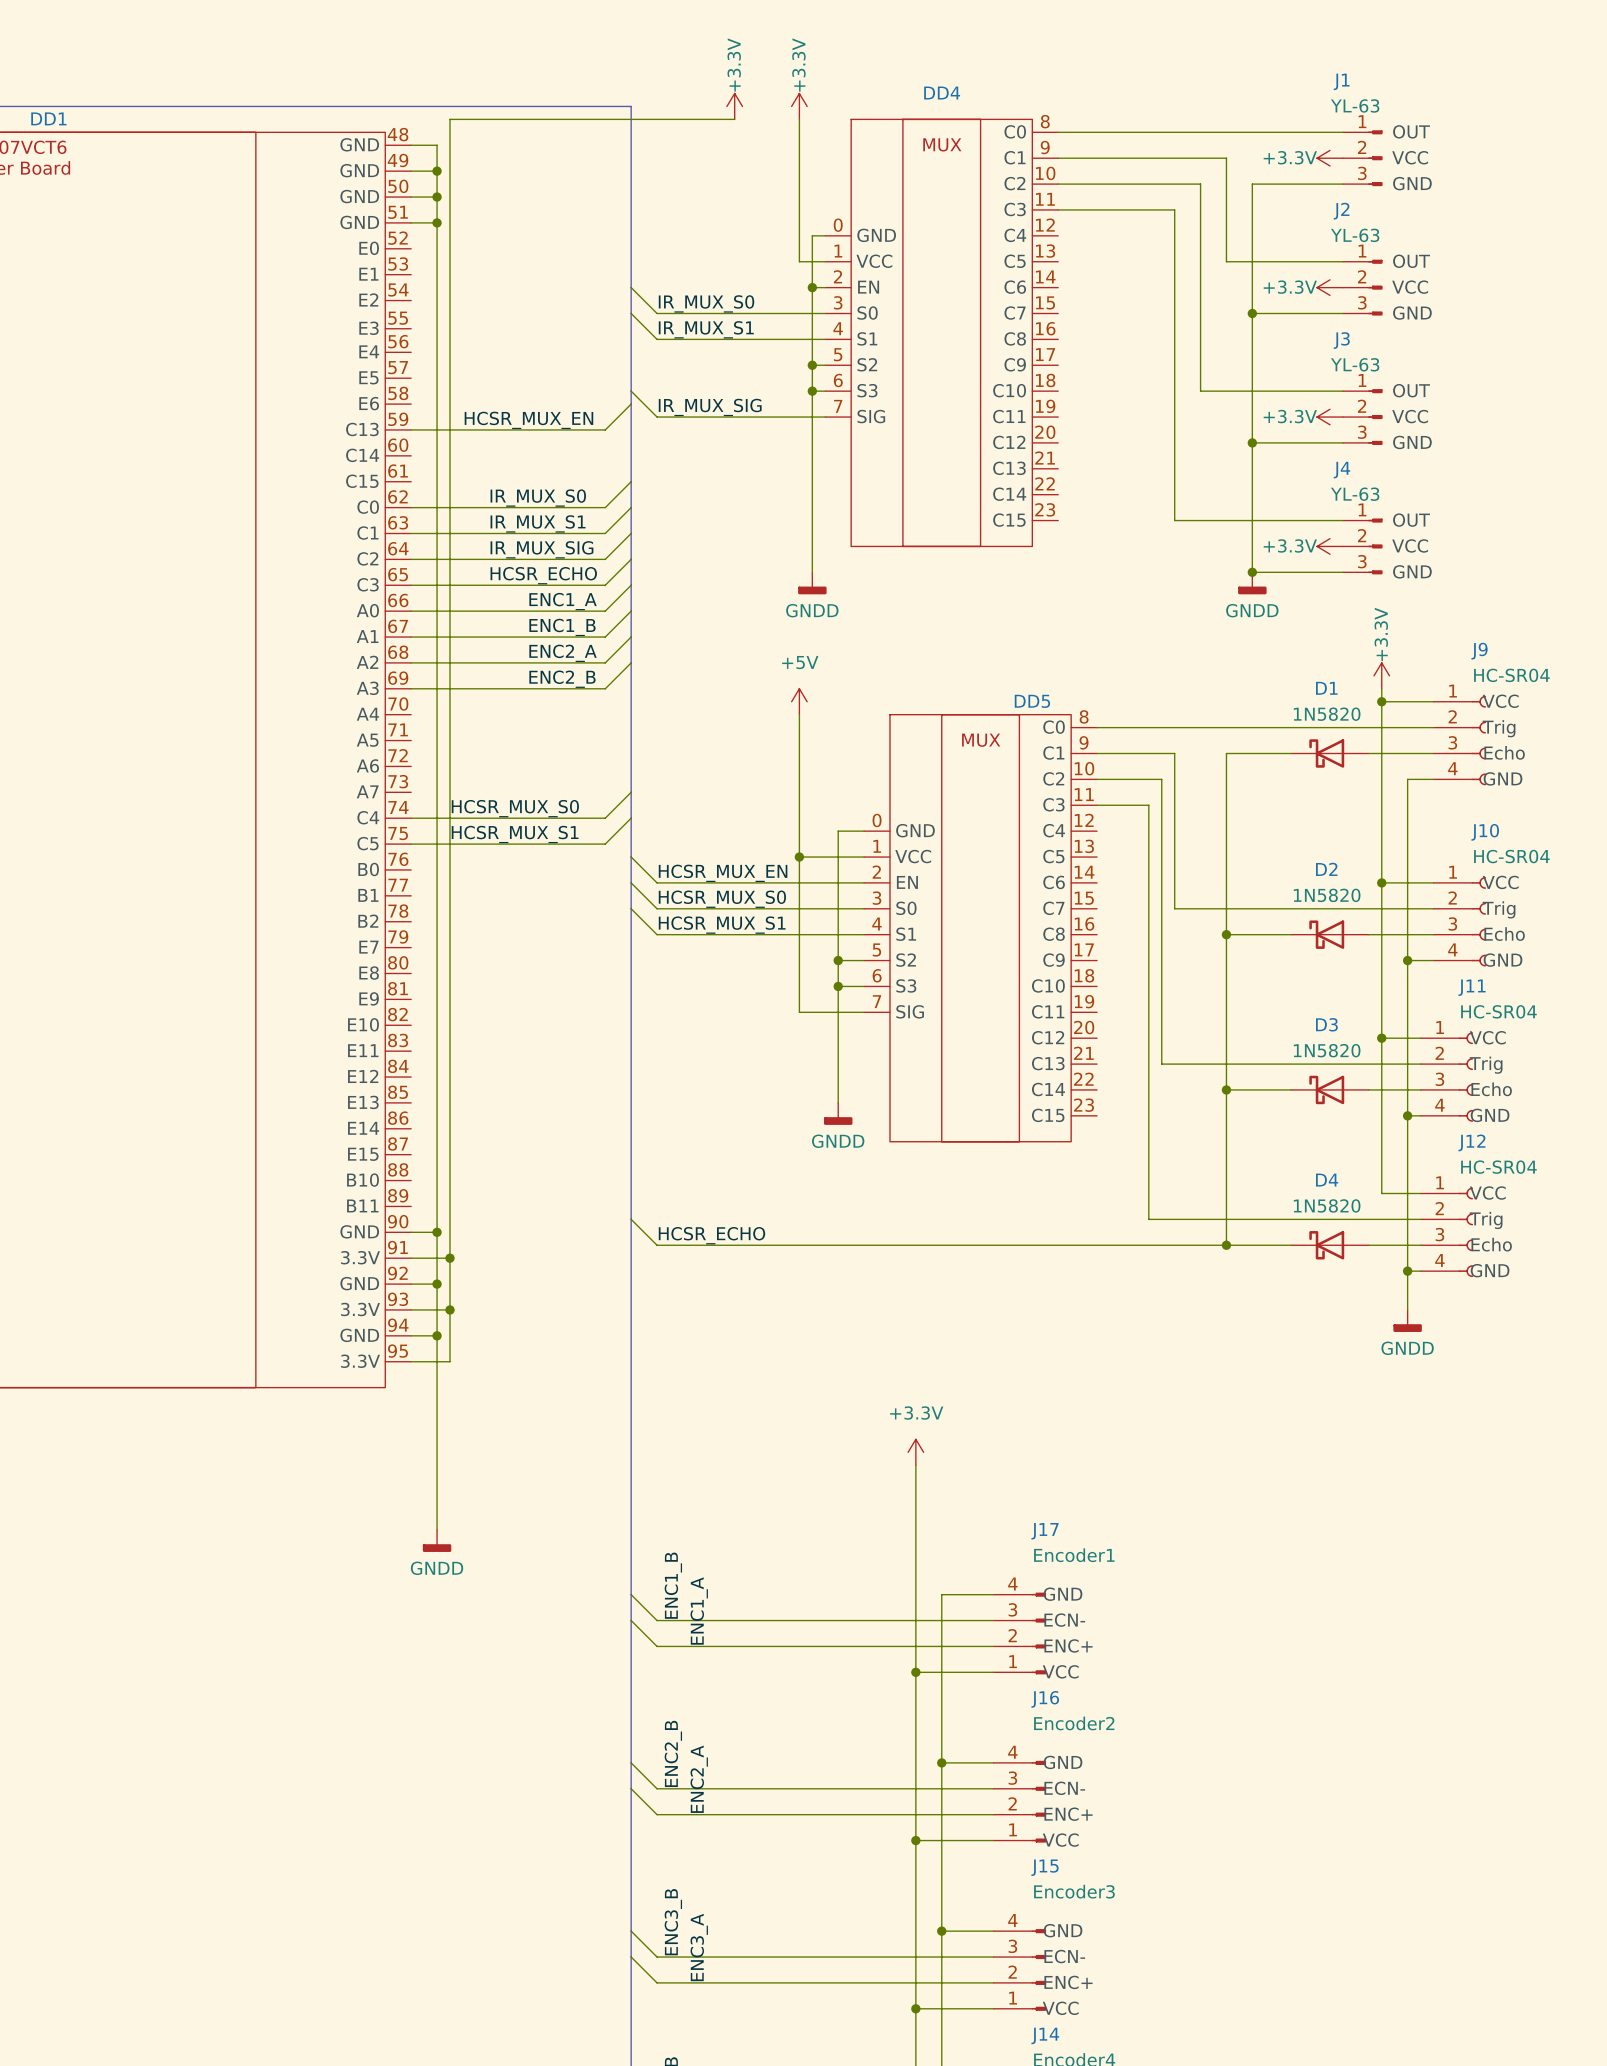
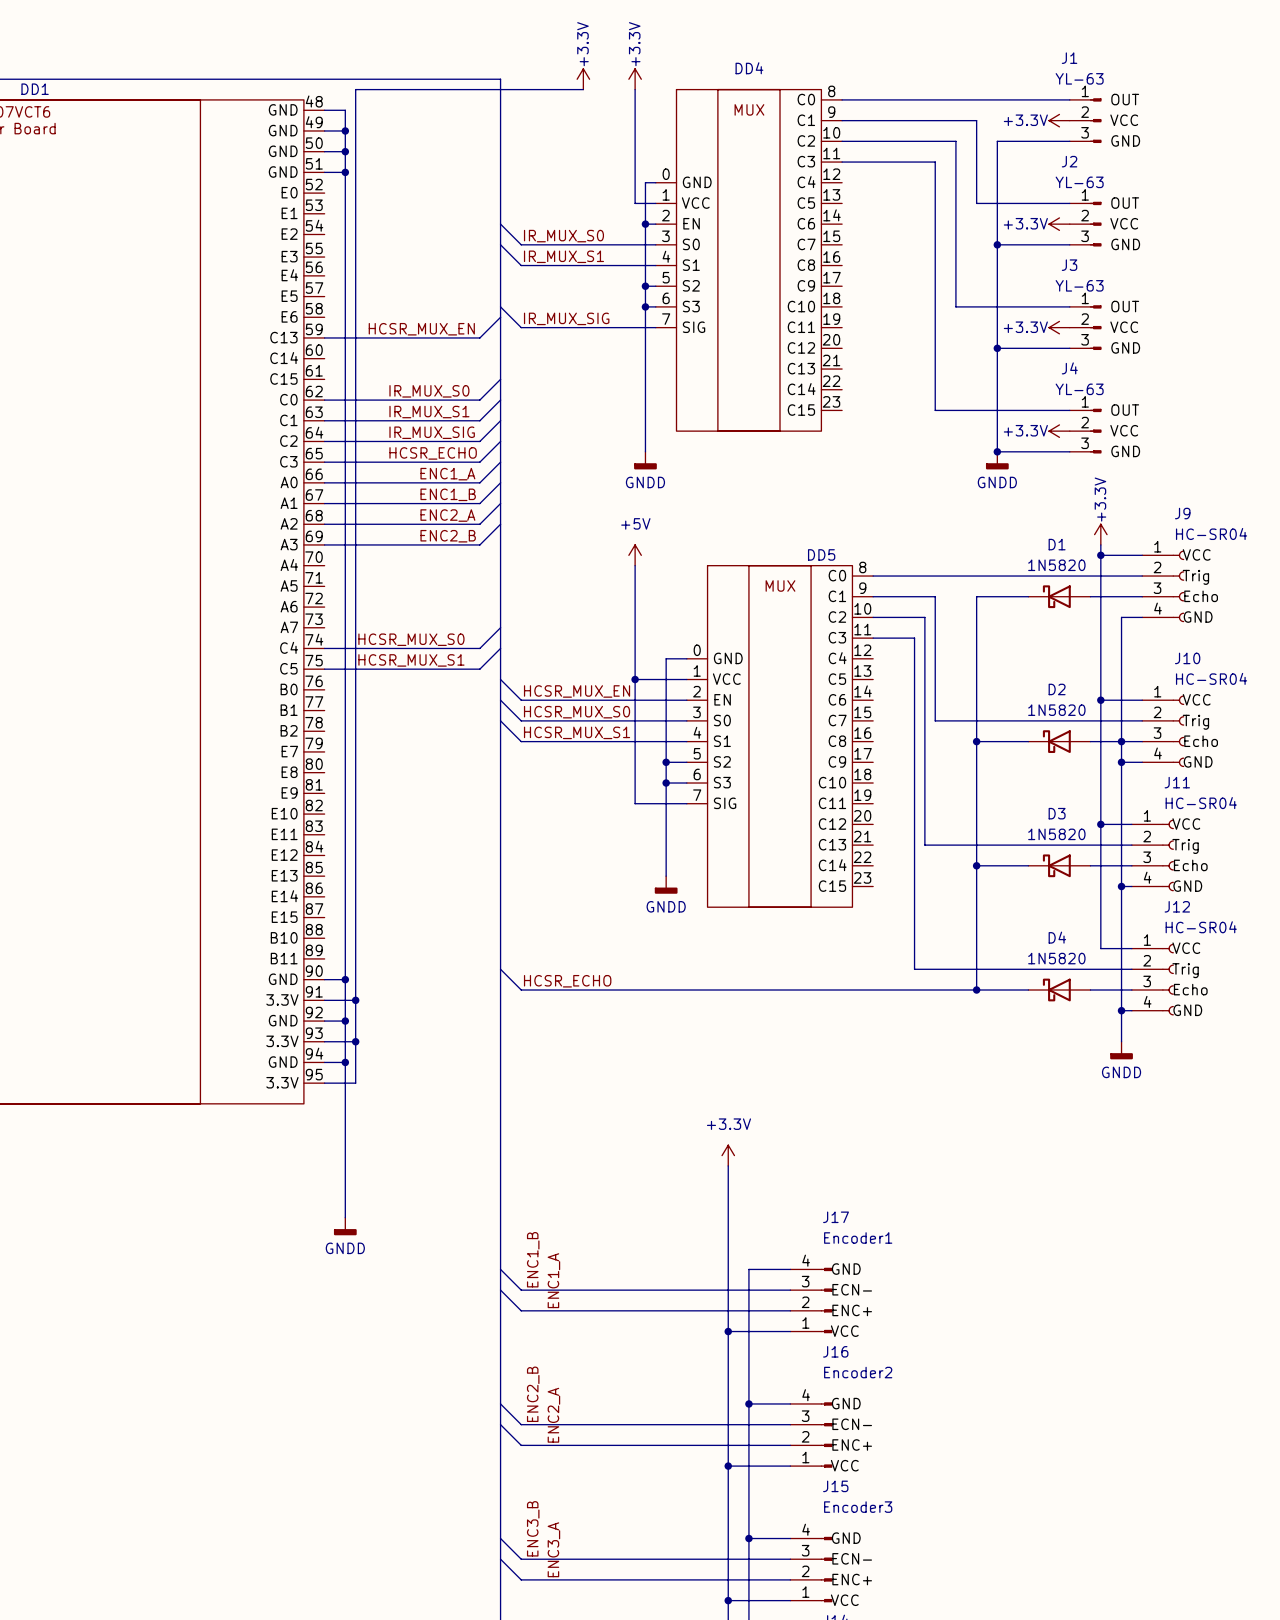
junction: none -> (1121, 741)

